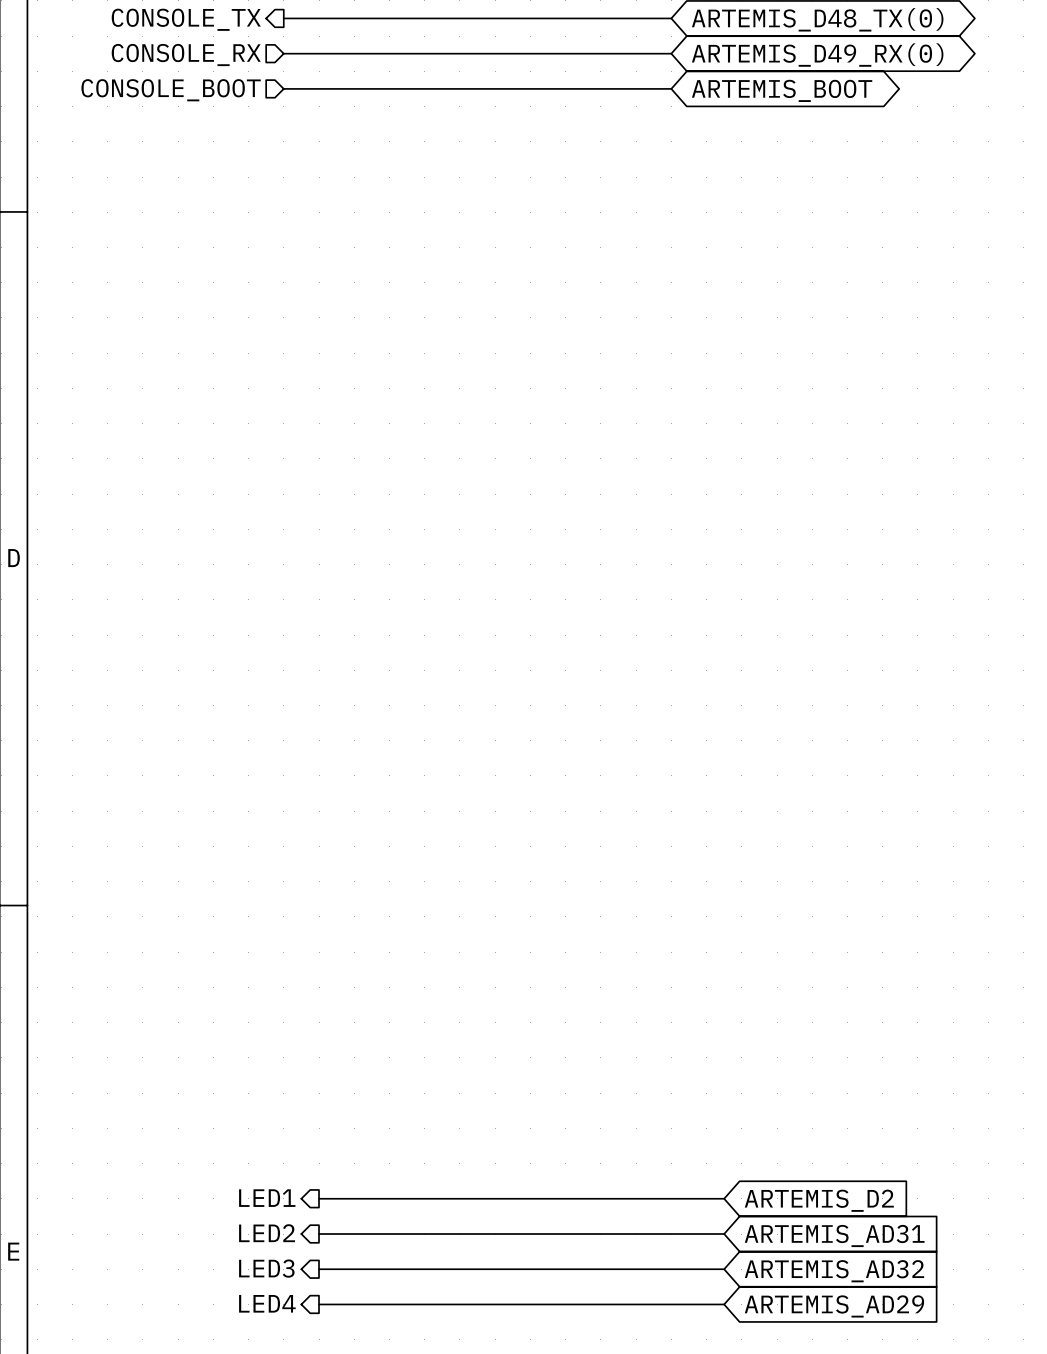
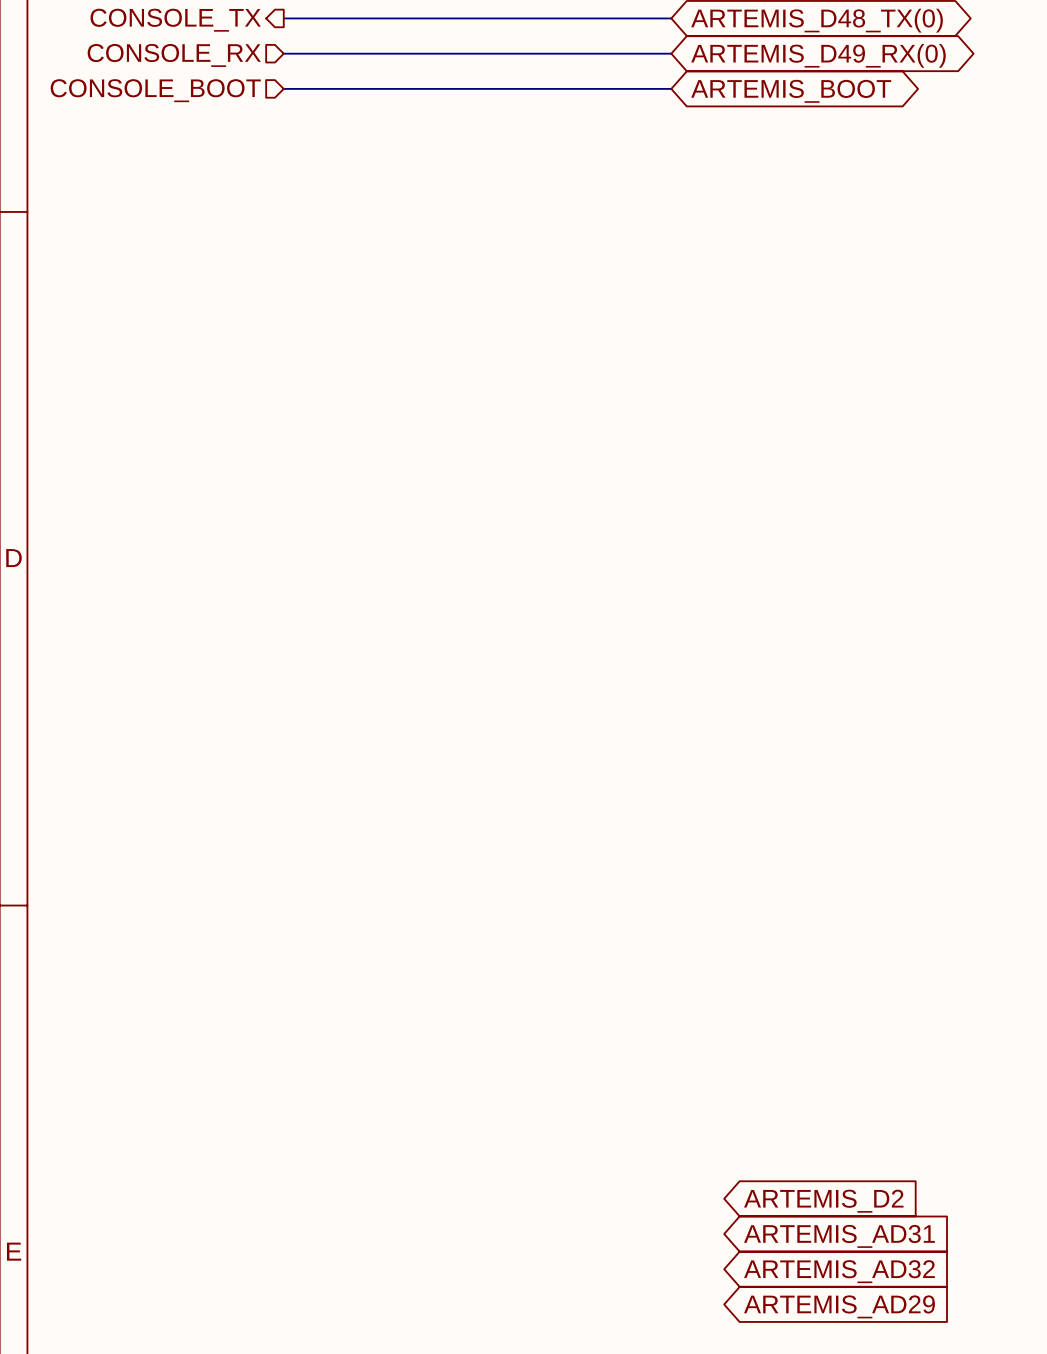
hierarchical label: LED1 (267, 1198) -> none
wire: (319, 1198) (724, 1198) -> none
hierarchical label: LED2 (267, 1233) -> none
wire: (319, 1234) (724, 1234) -> none
hierarchical label: LED3 (266, 1268) -> none
wire: (319, 1269) (724, 1269) -> none
hierarchical label: LED4 (267, 1303) -> none
wire: (319, 1304) (724, 1304) -> none

